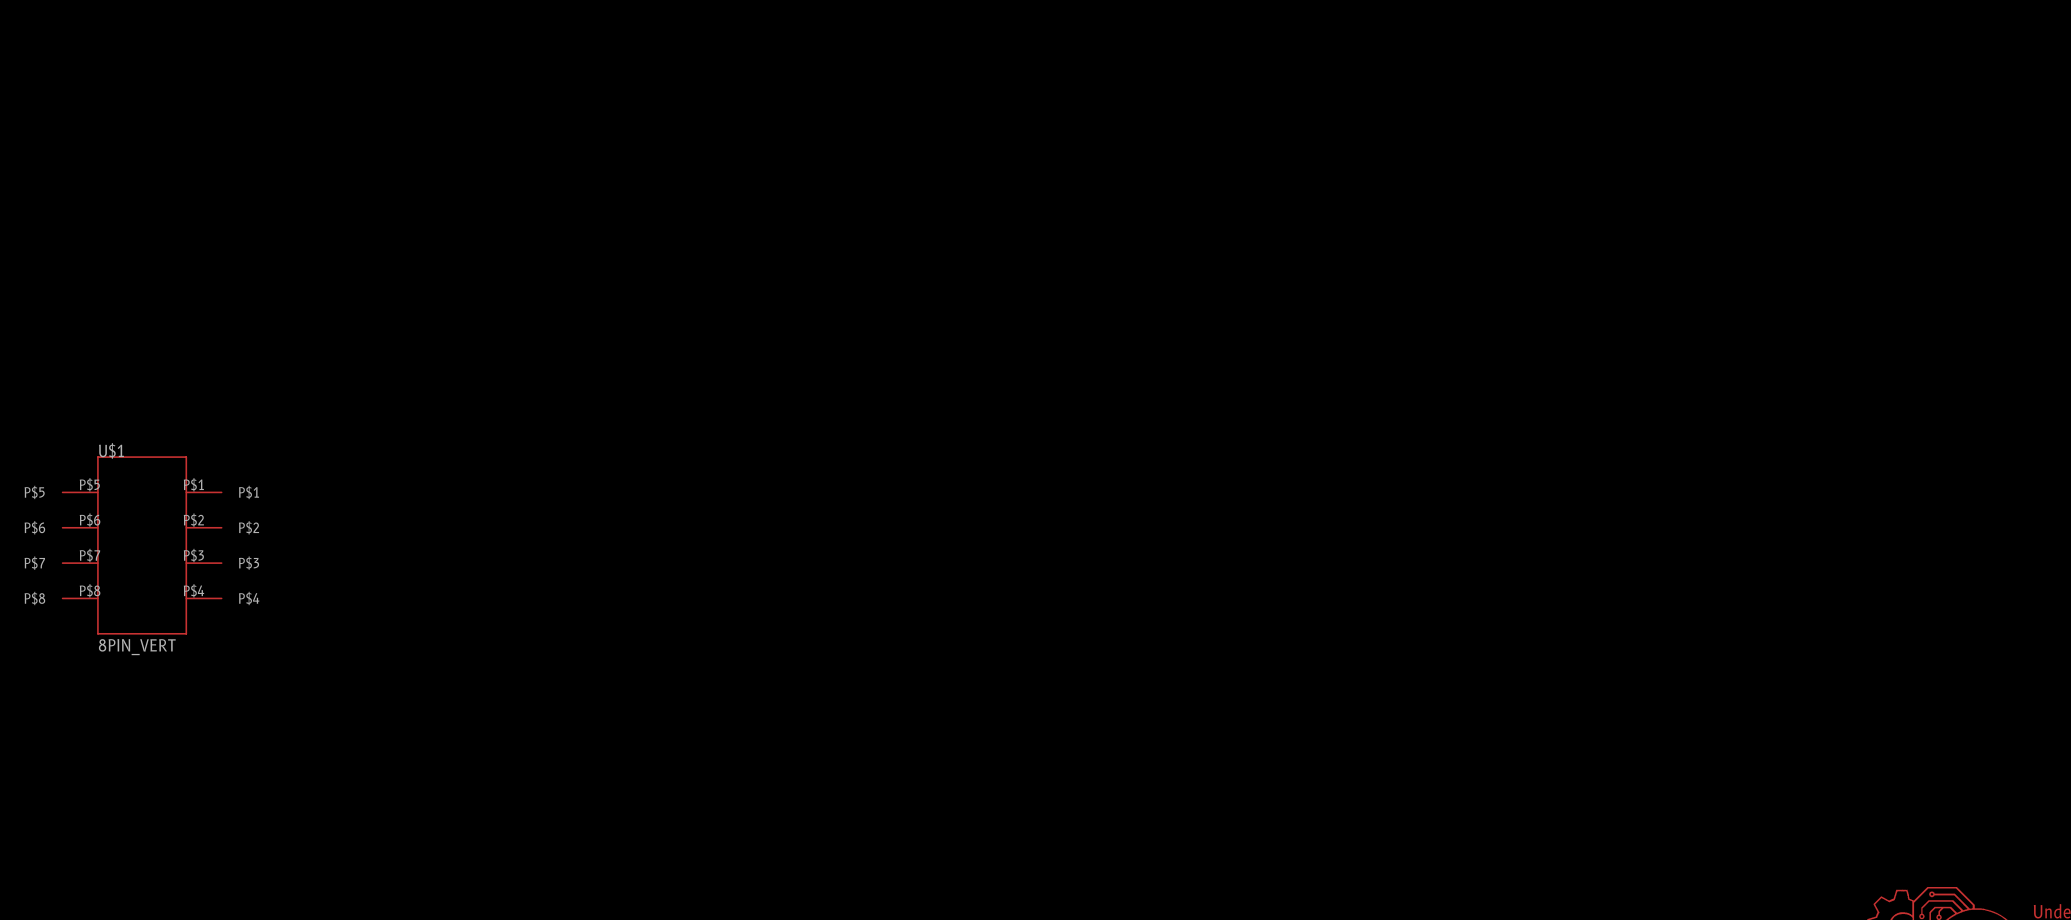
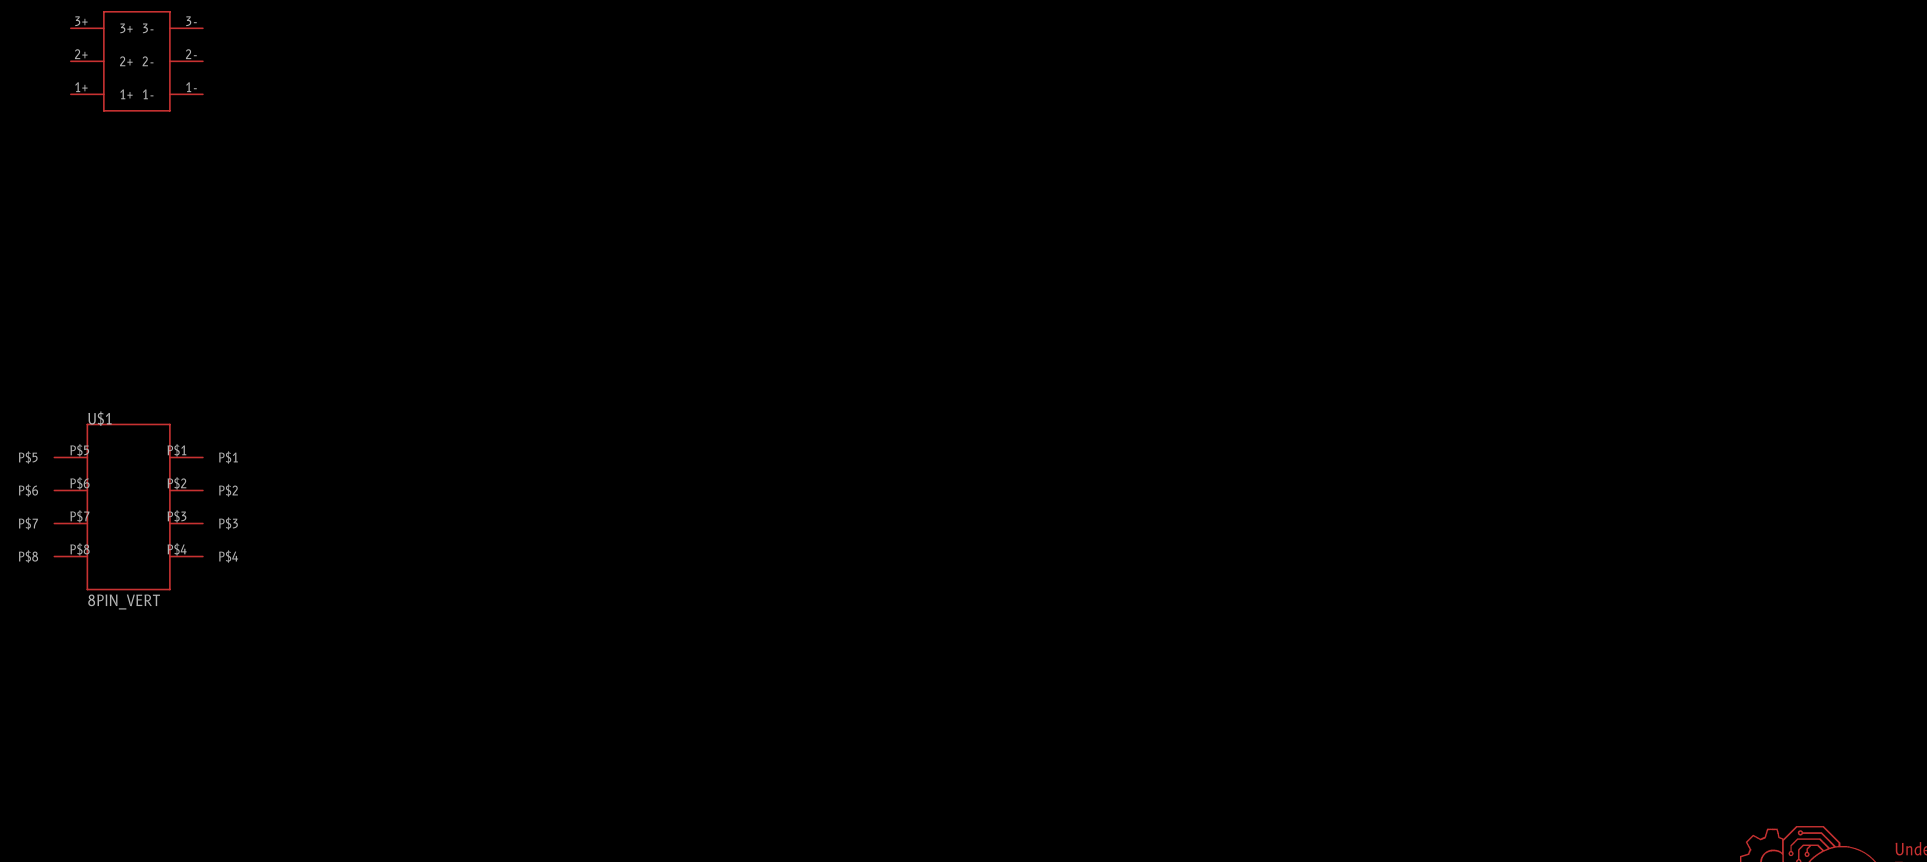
part: none -> (136, 61)

